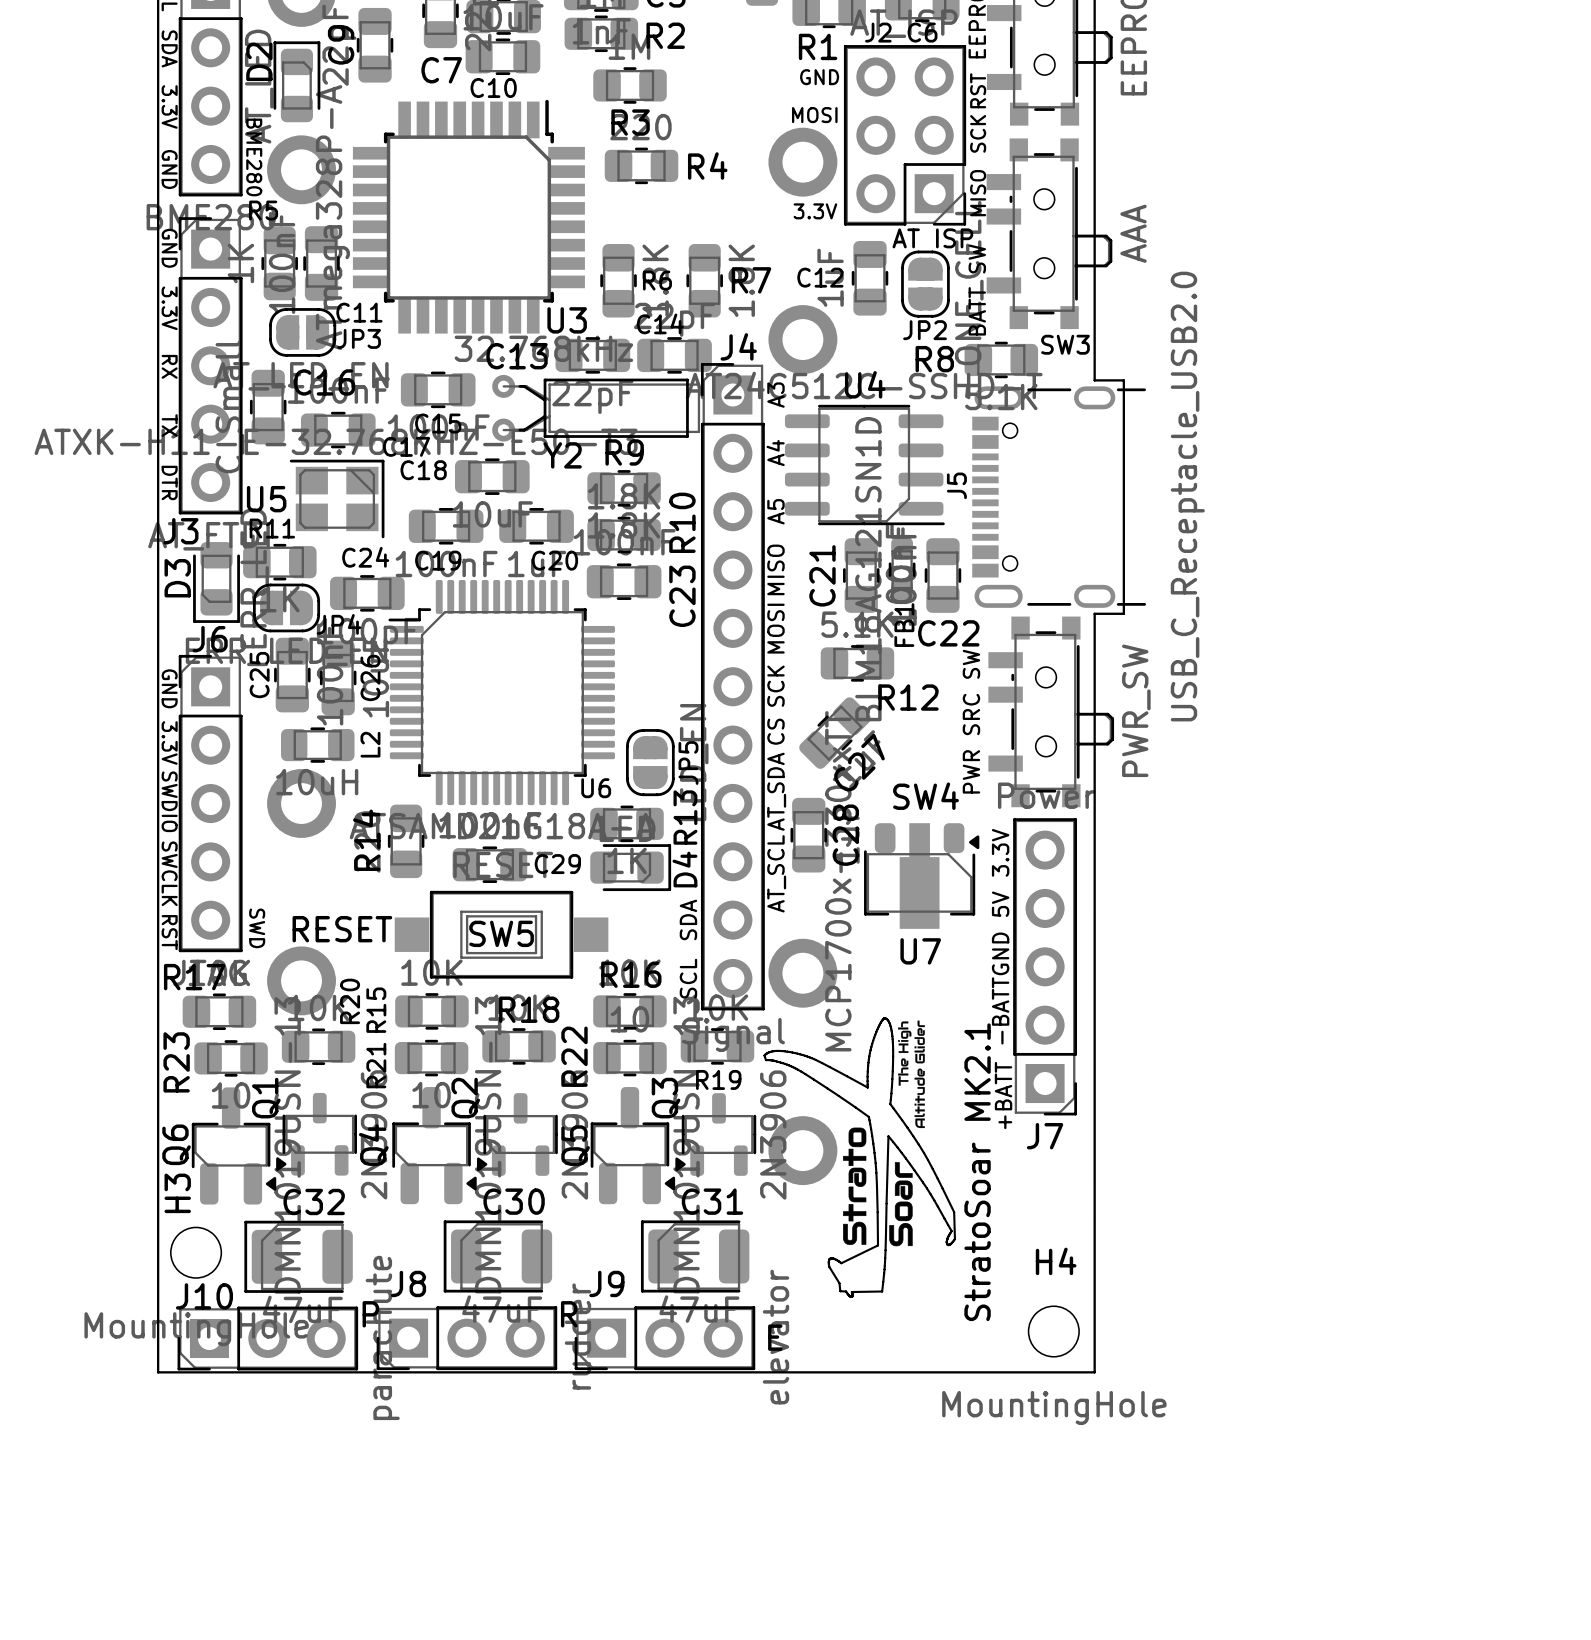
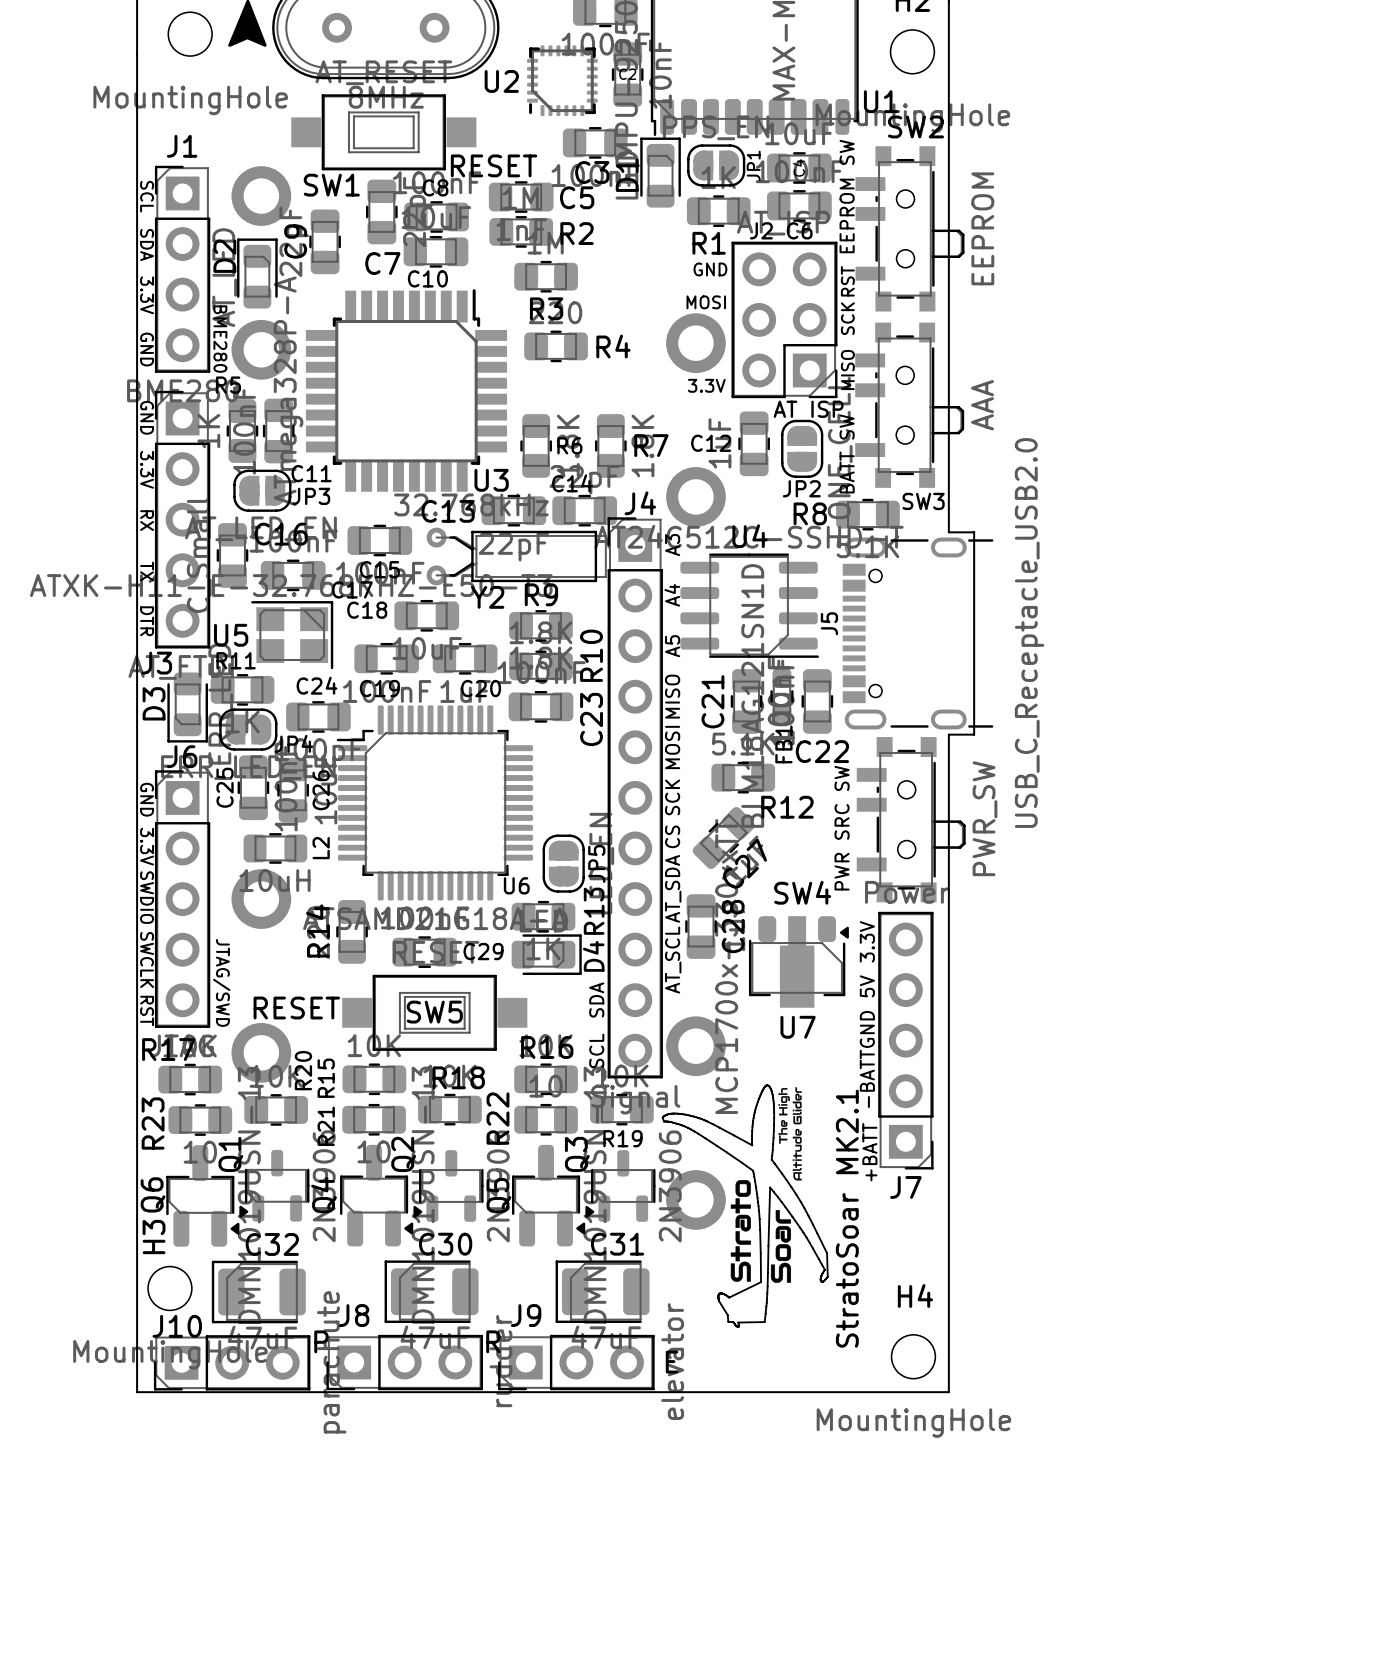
text: none -> JTAG/SWD (221, 982)
text: SWD (257, 928) -> none

